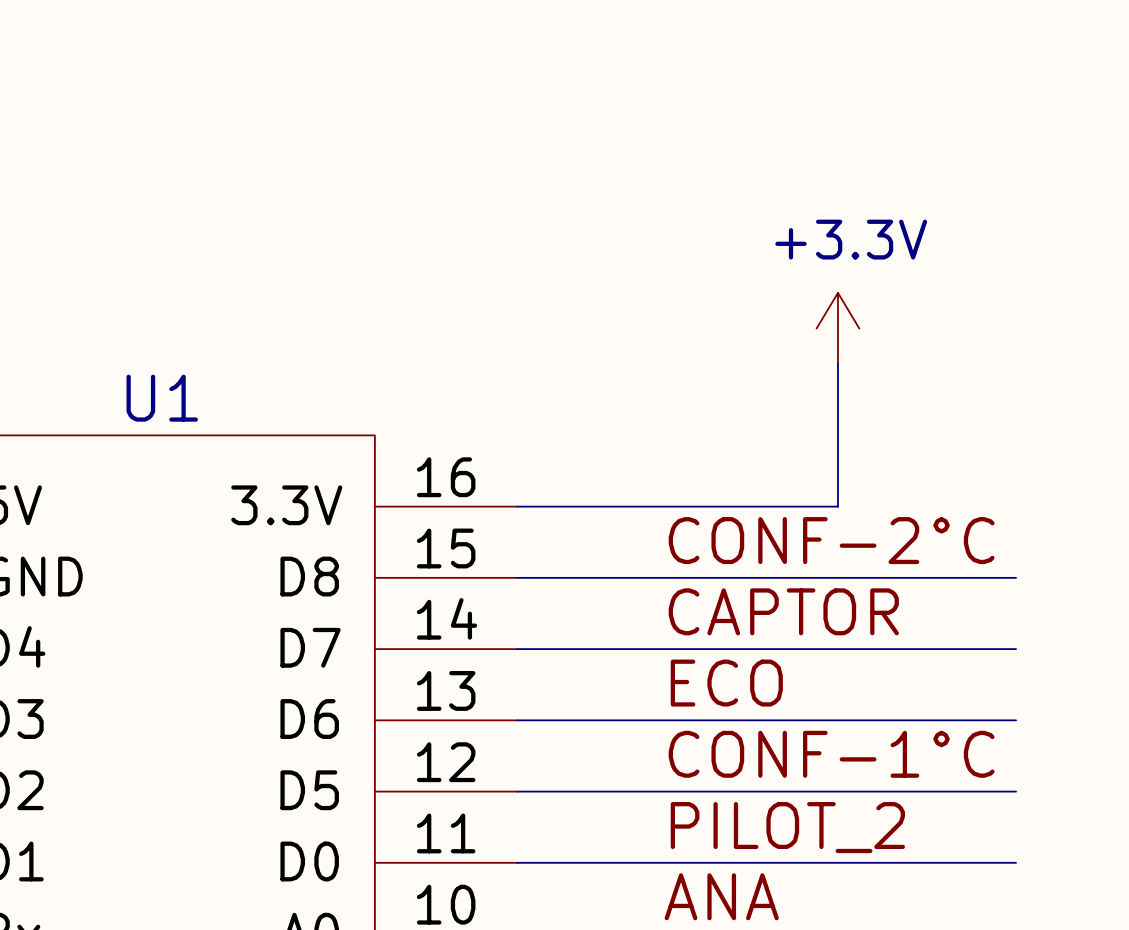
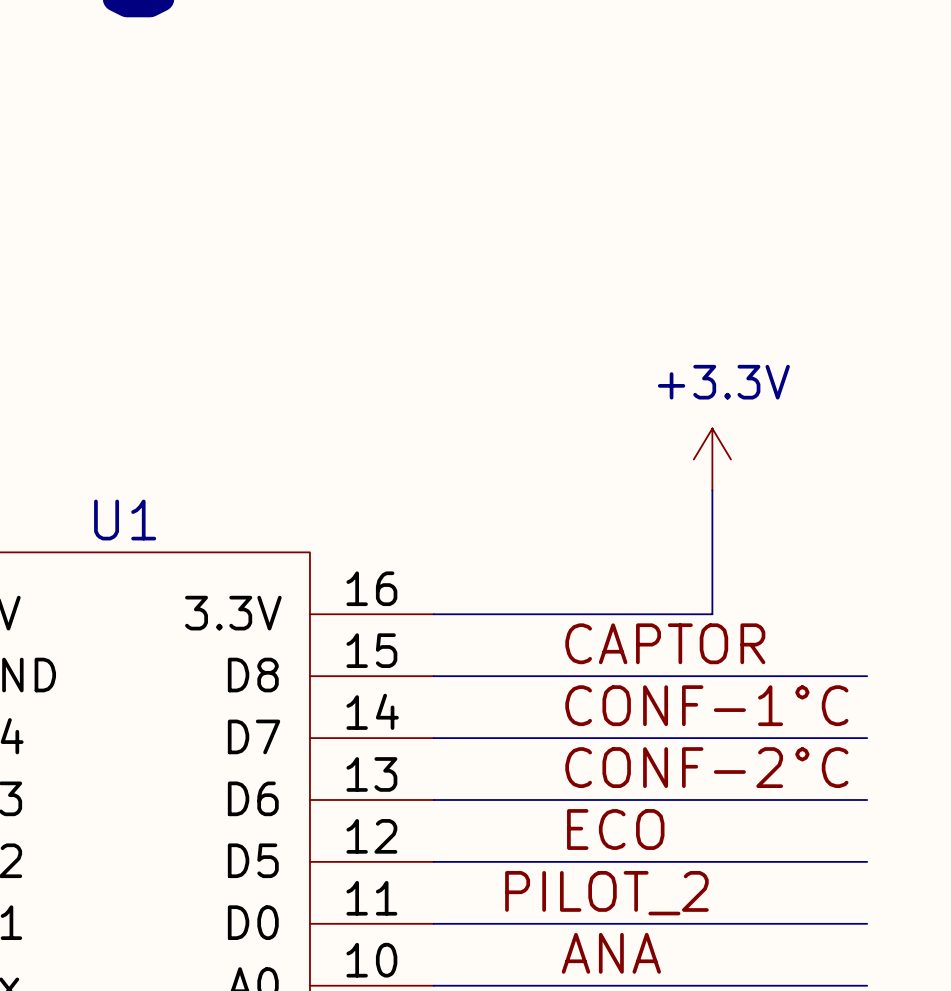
label: CONF-2°C (831, 540) -> CAPTOR (665, 643)
label: CAPTOR (783, 611) -> CONF-1°C (706, 705)
label: ECO (726, 683) -> CONF-2°C (706, 767)
label: CONF-1°C (831, 754) -> ECO (615, 829)
label position: PILOT_2 (787, 827) -> PILOT_2 (606, 893)

